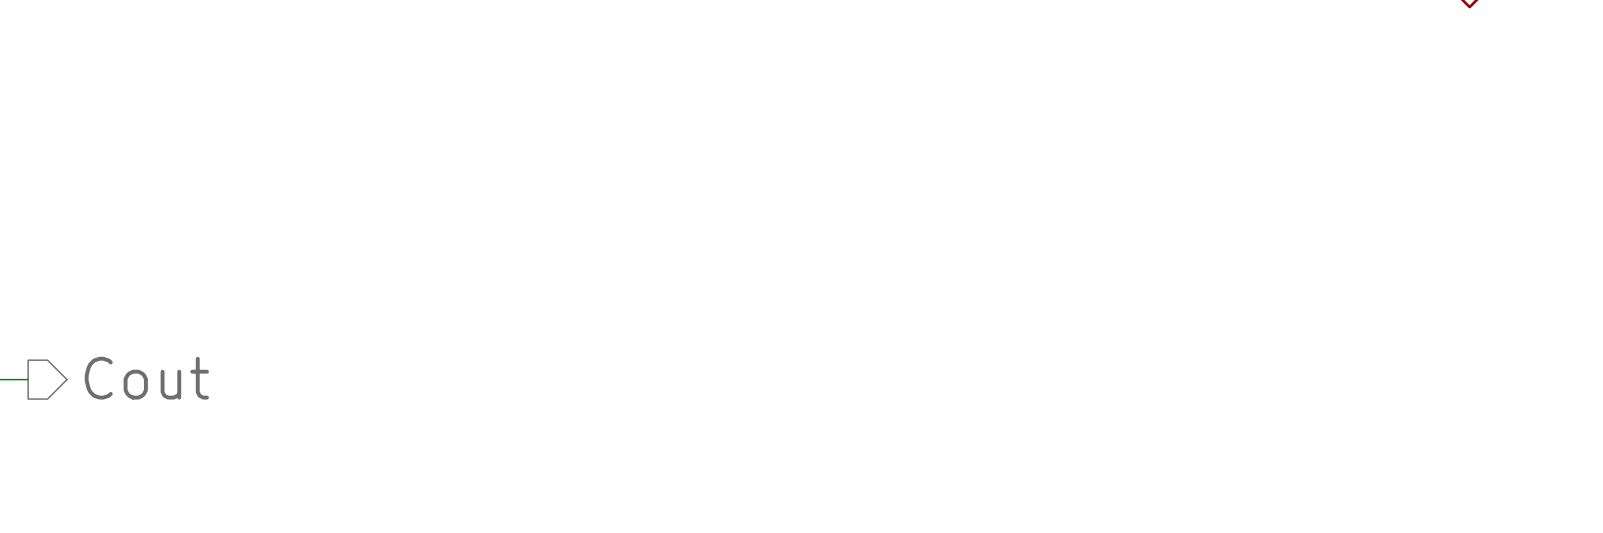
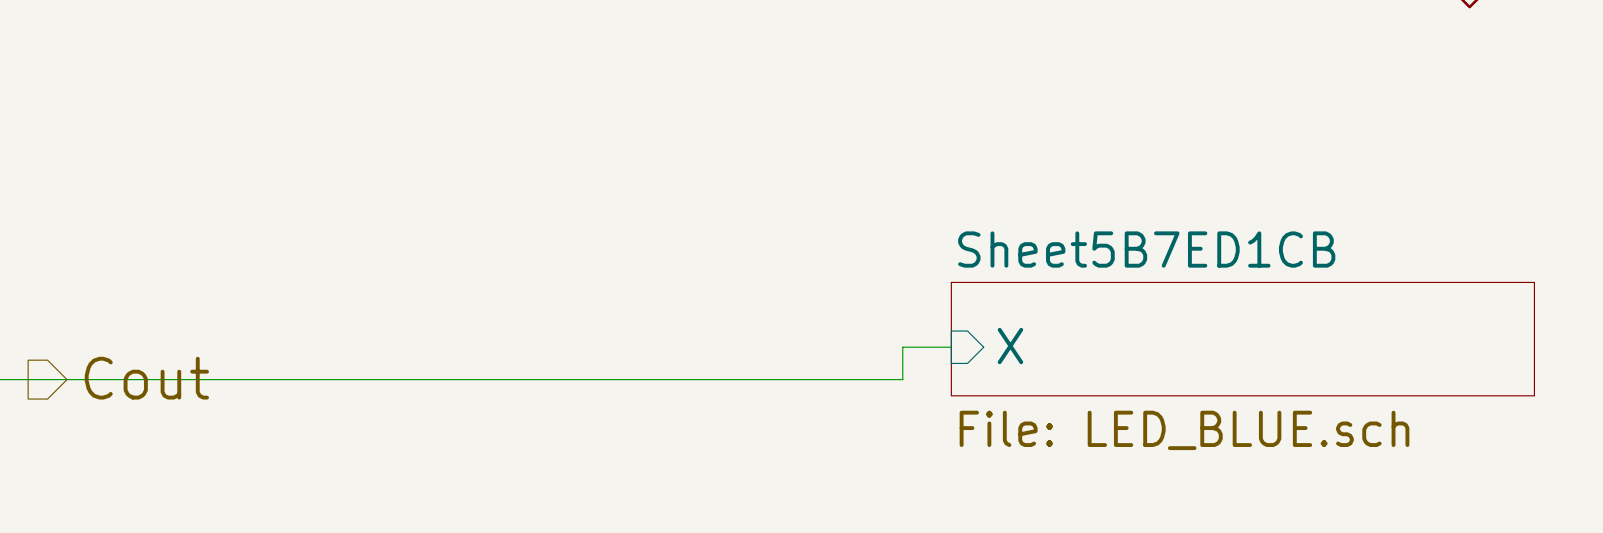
sheet Sheet5B7ED1CB: none -> File: LED_BLUE.sch (1242, 339)
sheet pin: none -> X (1010, 346)
wire: none -> (951, 347) (902, 347) (902, 379) (28, 379)

